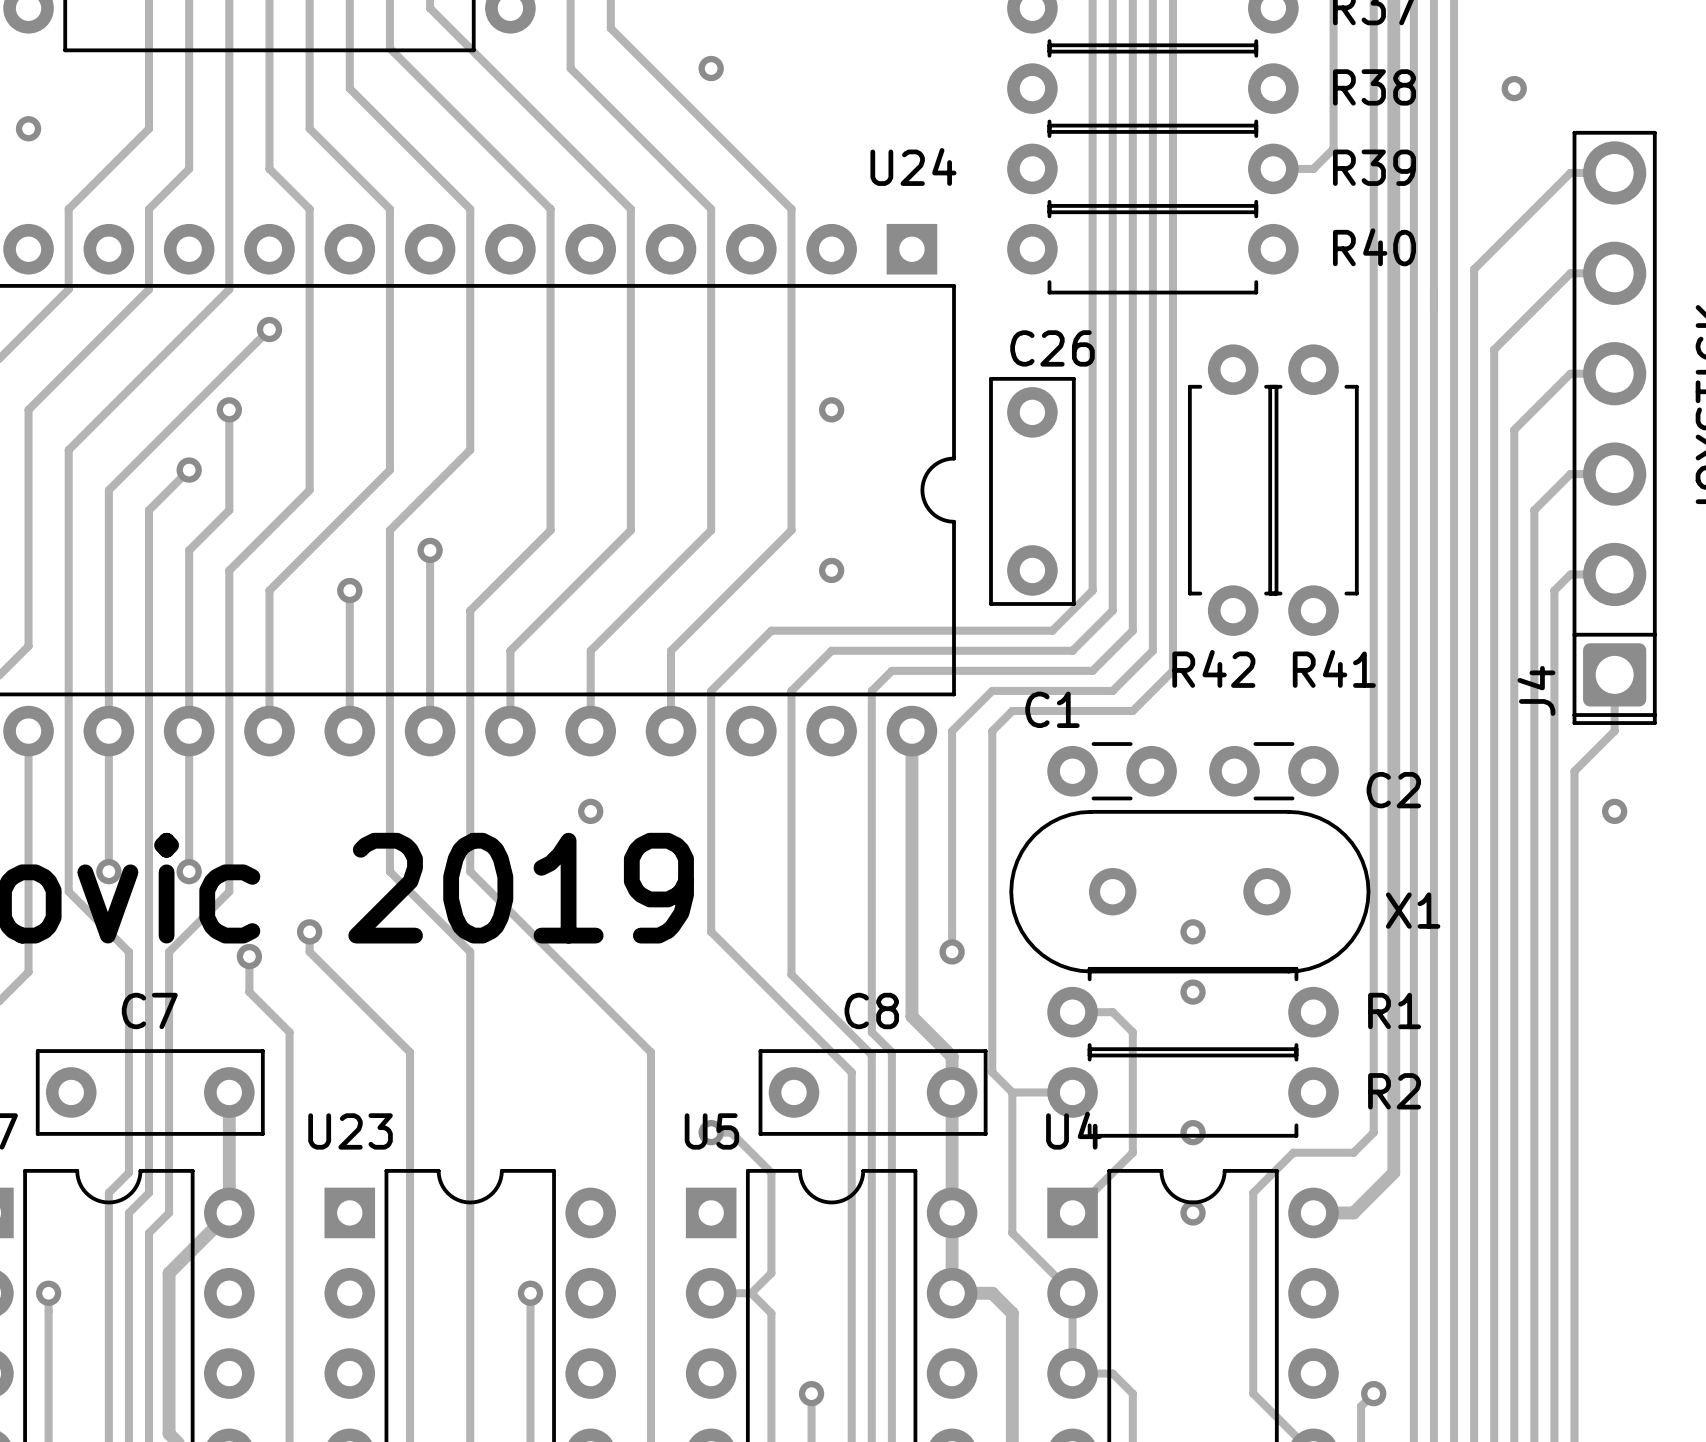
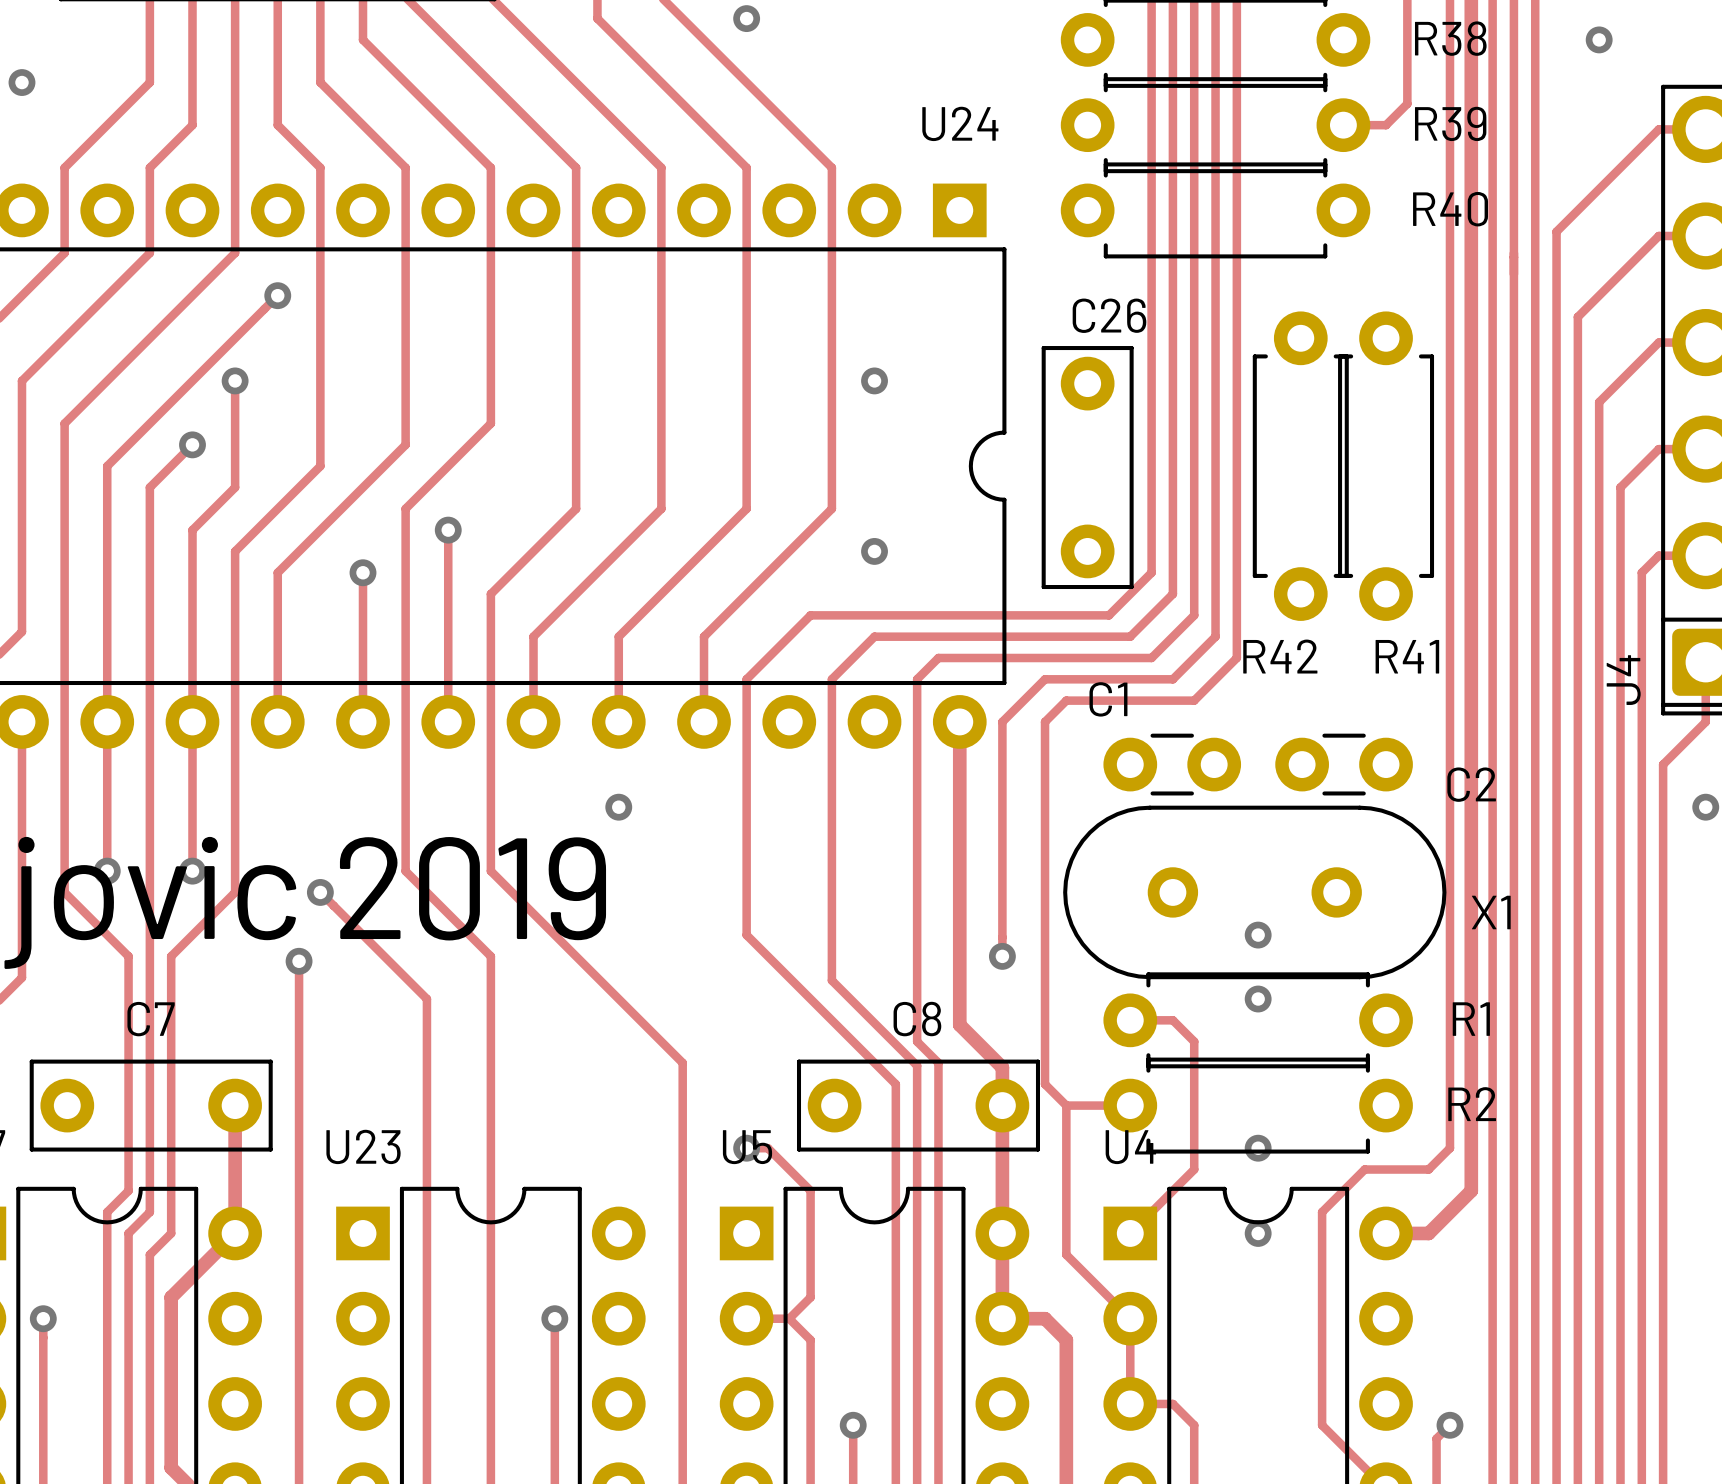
via: none -> (320, 892)
track: (309, 931) (309, 951) (410, 1052) -> (320, 892) (426, 999) (426, 1062)
via: (309, 931) -> none
track: (249, 956) (249, 992) (289, 1032) -> (299, 961) (299, 1041)
via: (249, 956) -> none
via: none -> (299, 961)

